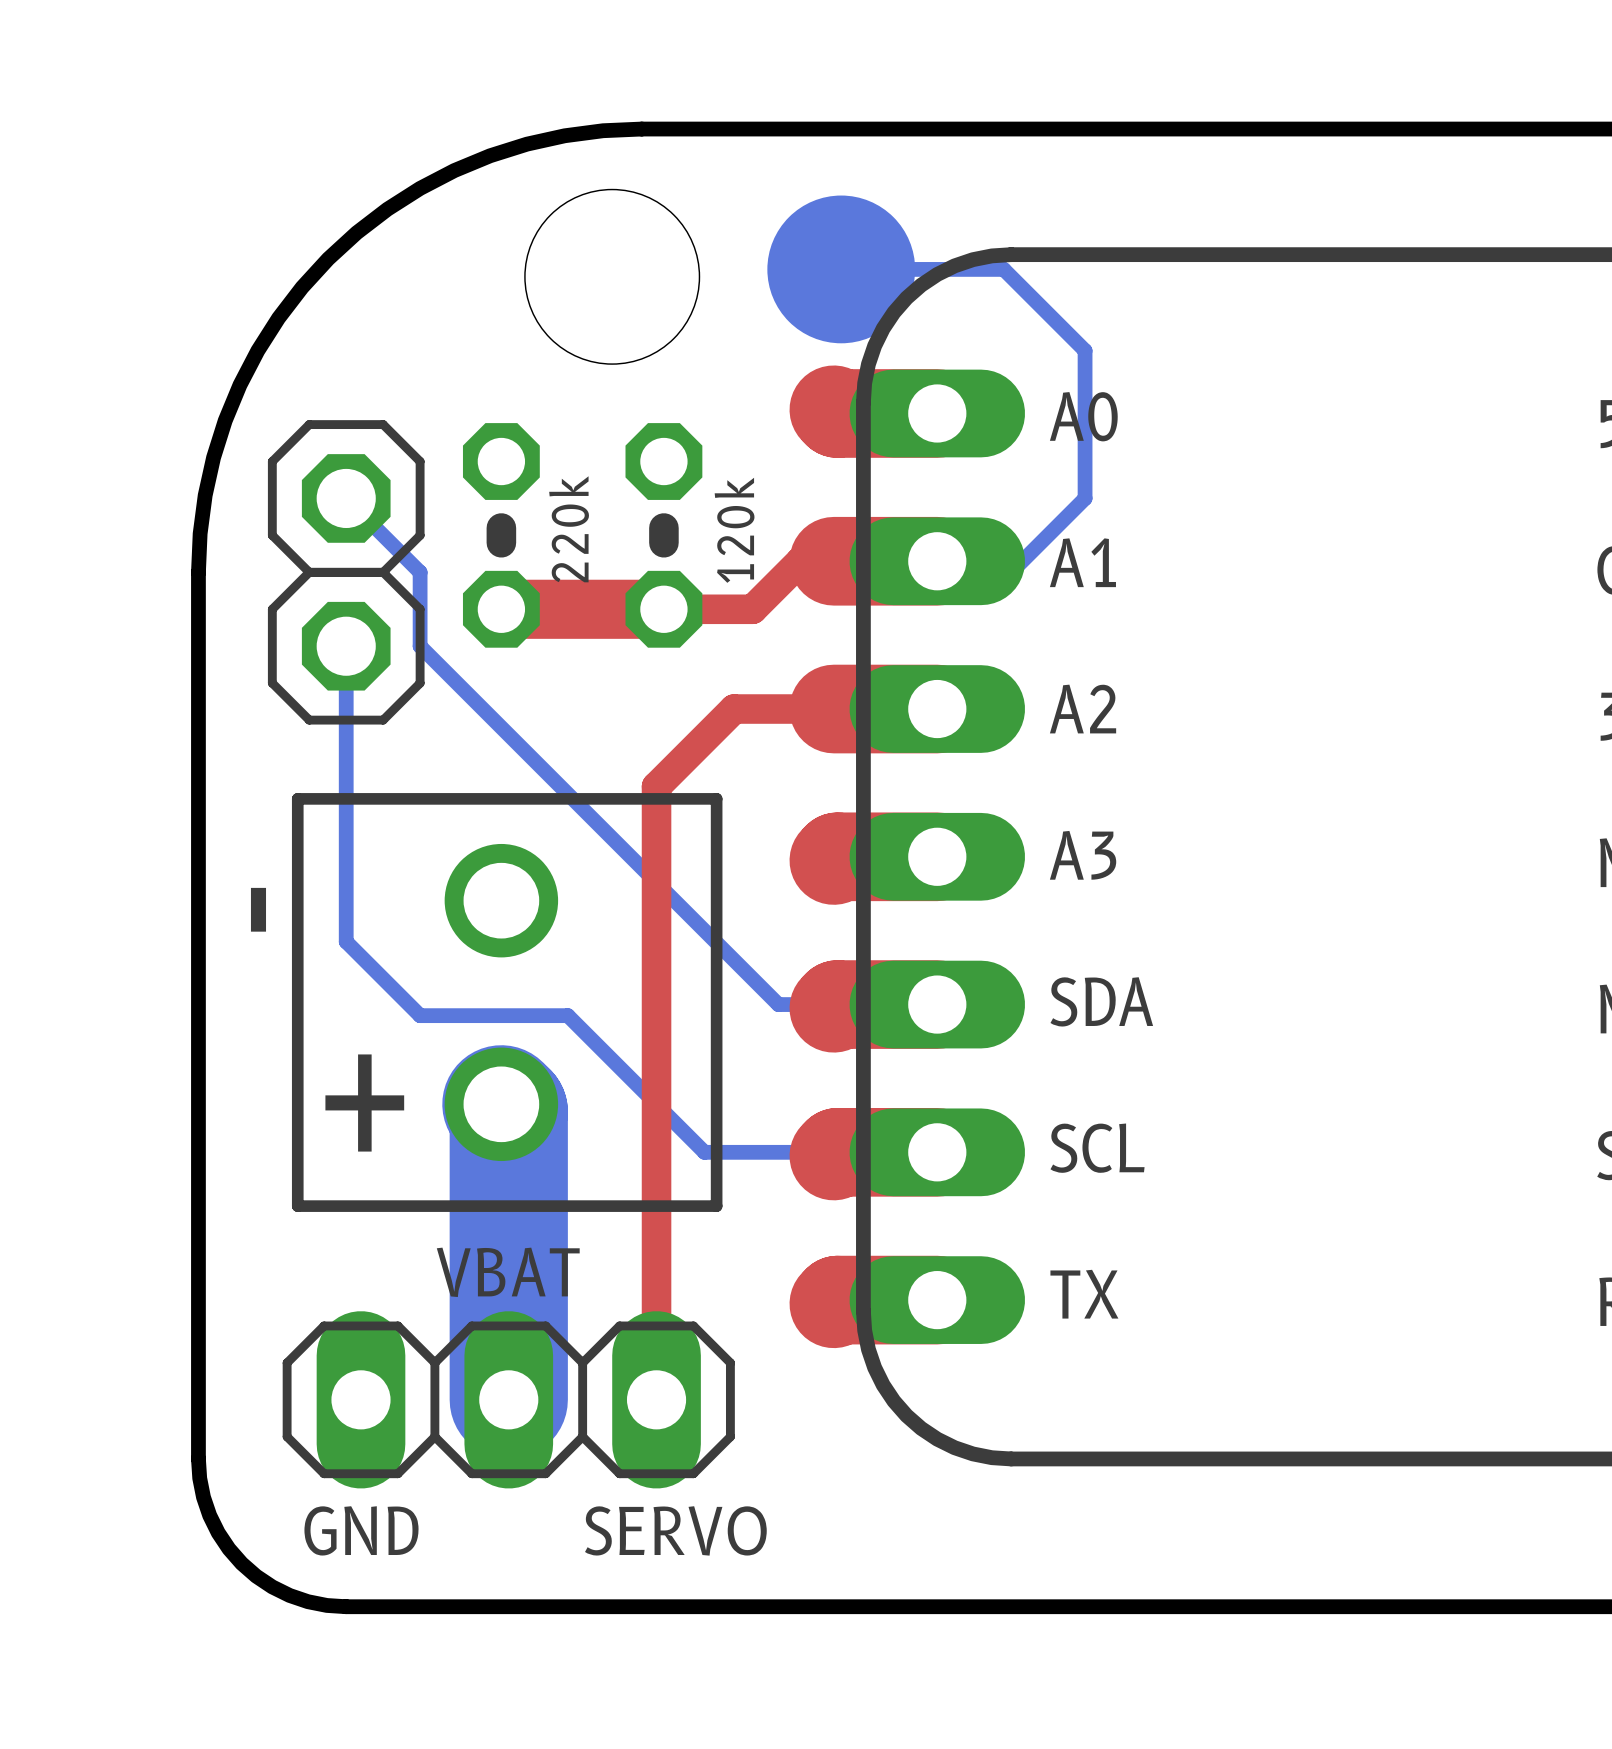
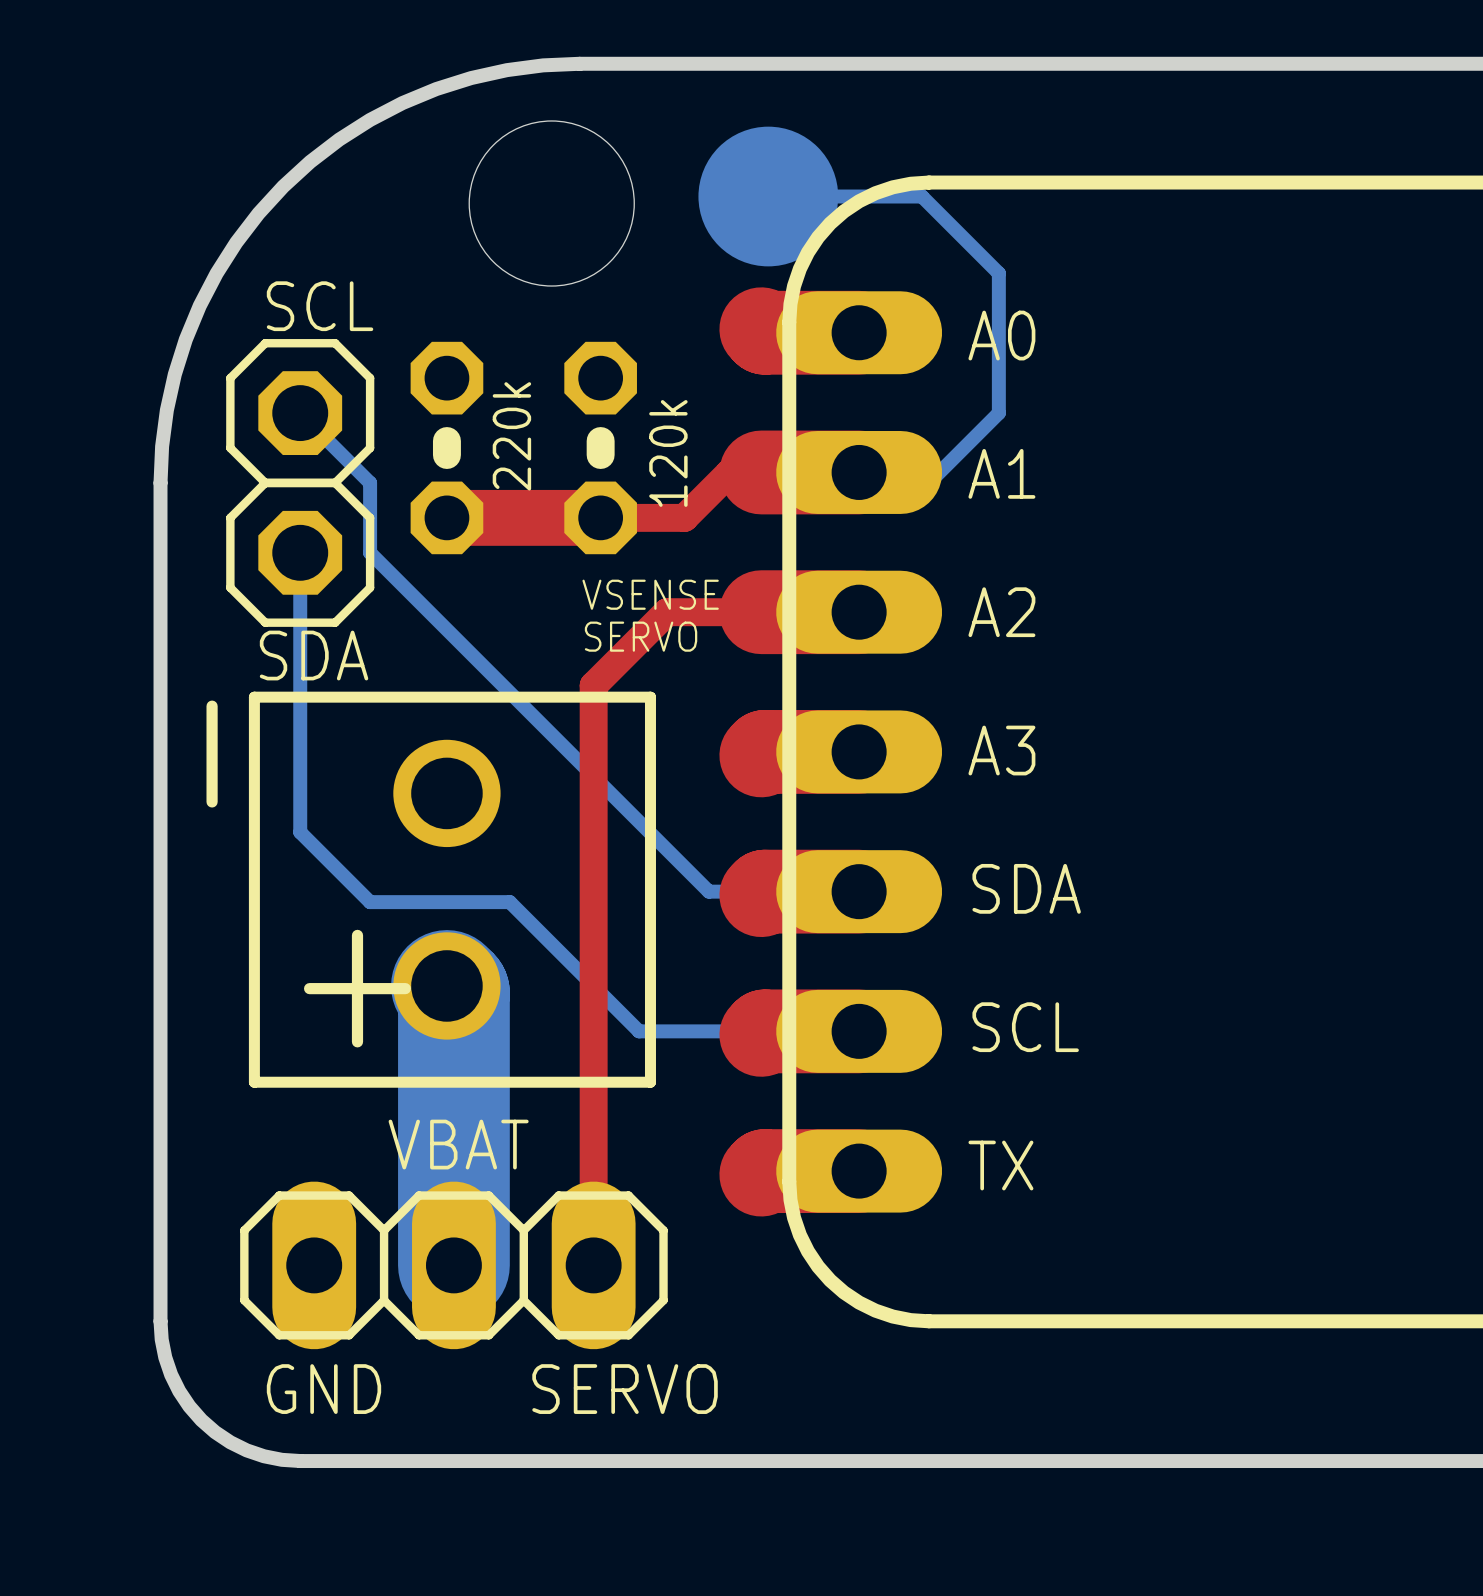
text: none -> SCL (320, 306)
text: none -> VSENSE (650, 594)
text: none -> SERVO (641, 636)
text: none -> SDA (314, 655)

